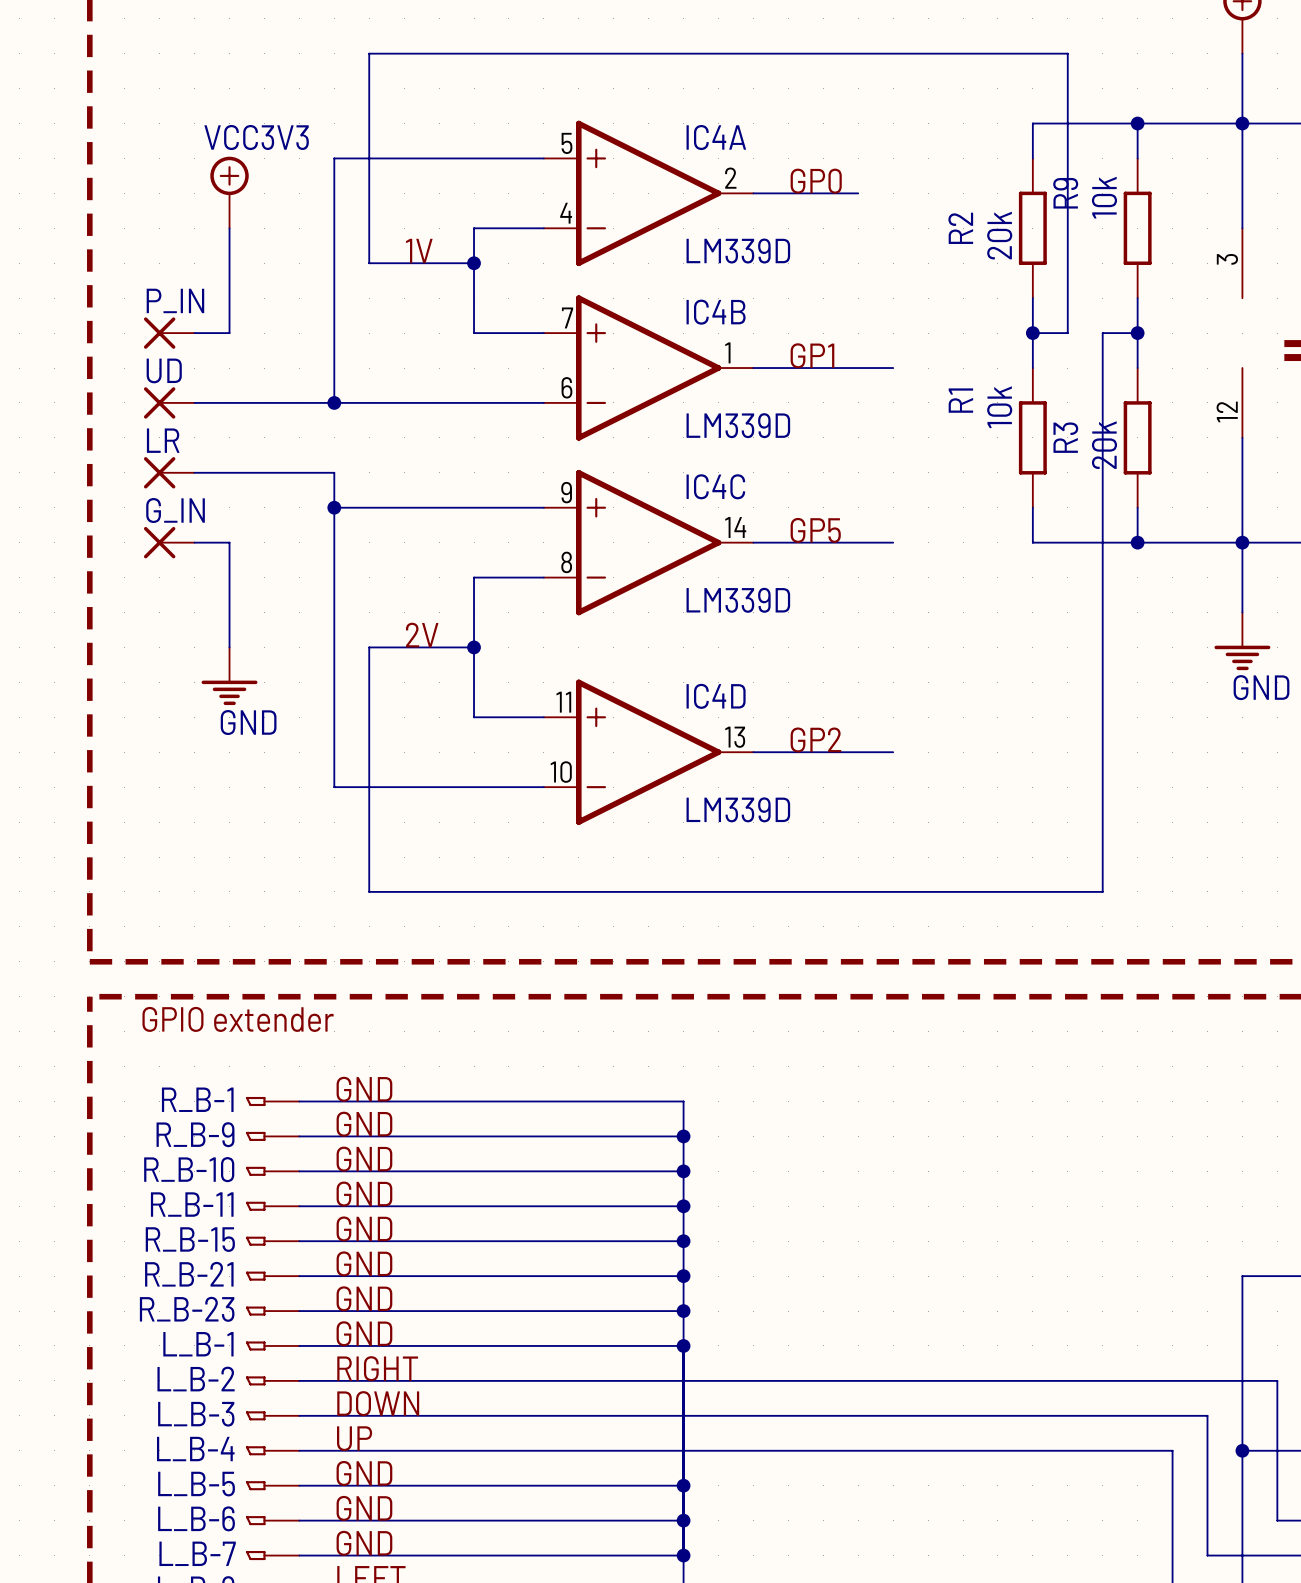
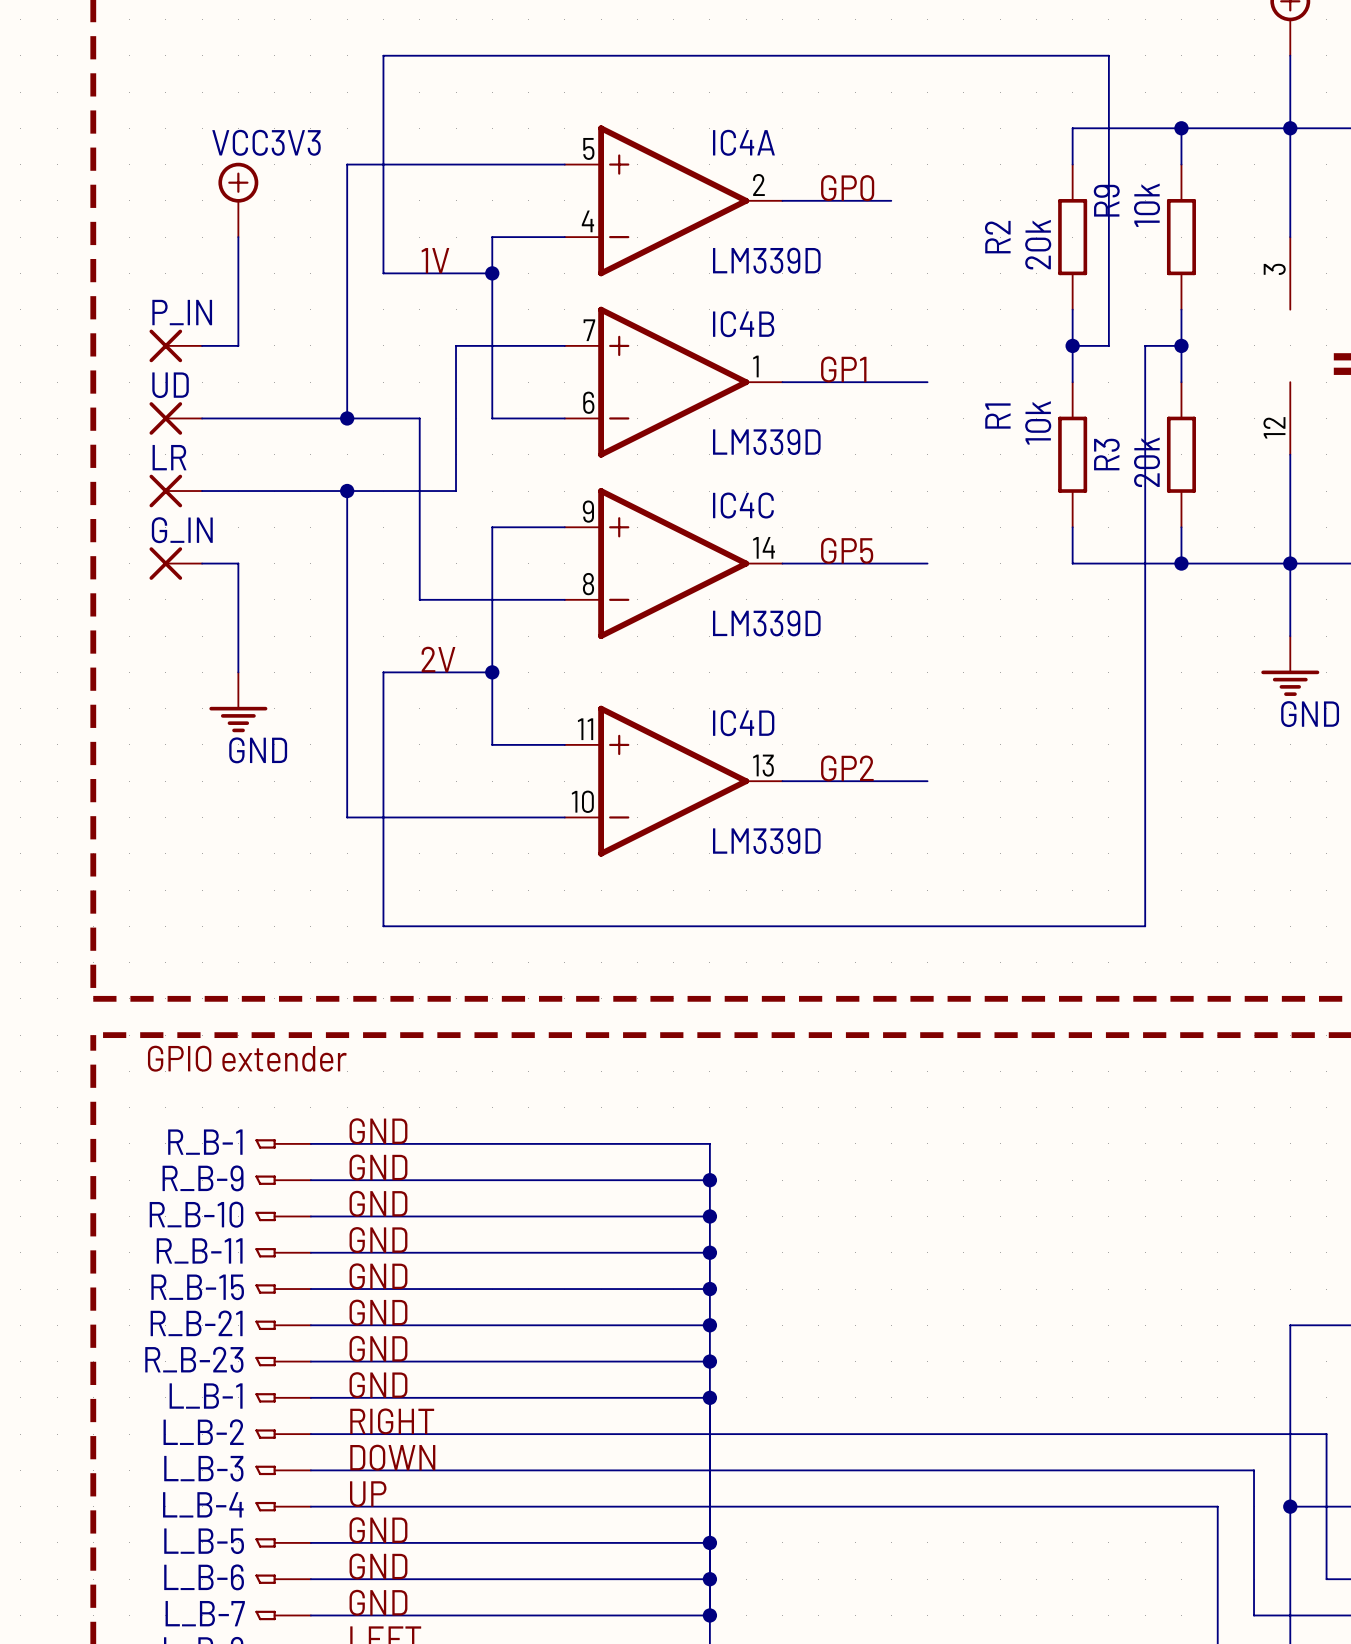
wire: (404, 402) (474, 402) -> (347, 491) (456, 491) (456, 345) (492, 345) (492, 418)
wire: (334, 507) (474, 507) -> (419, 418) (419, 599) (492, 599) (492, 527)
junction position: (334, 507) -> (347, 491)

